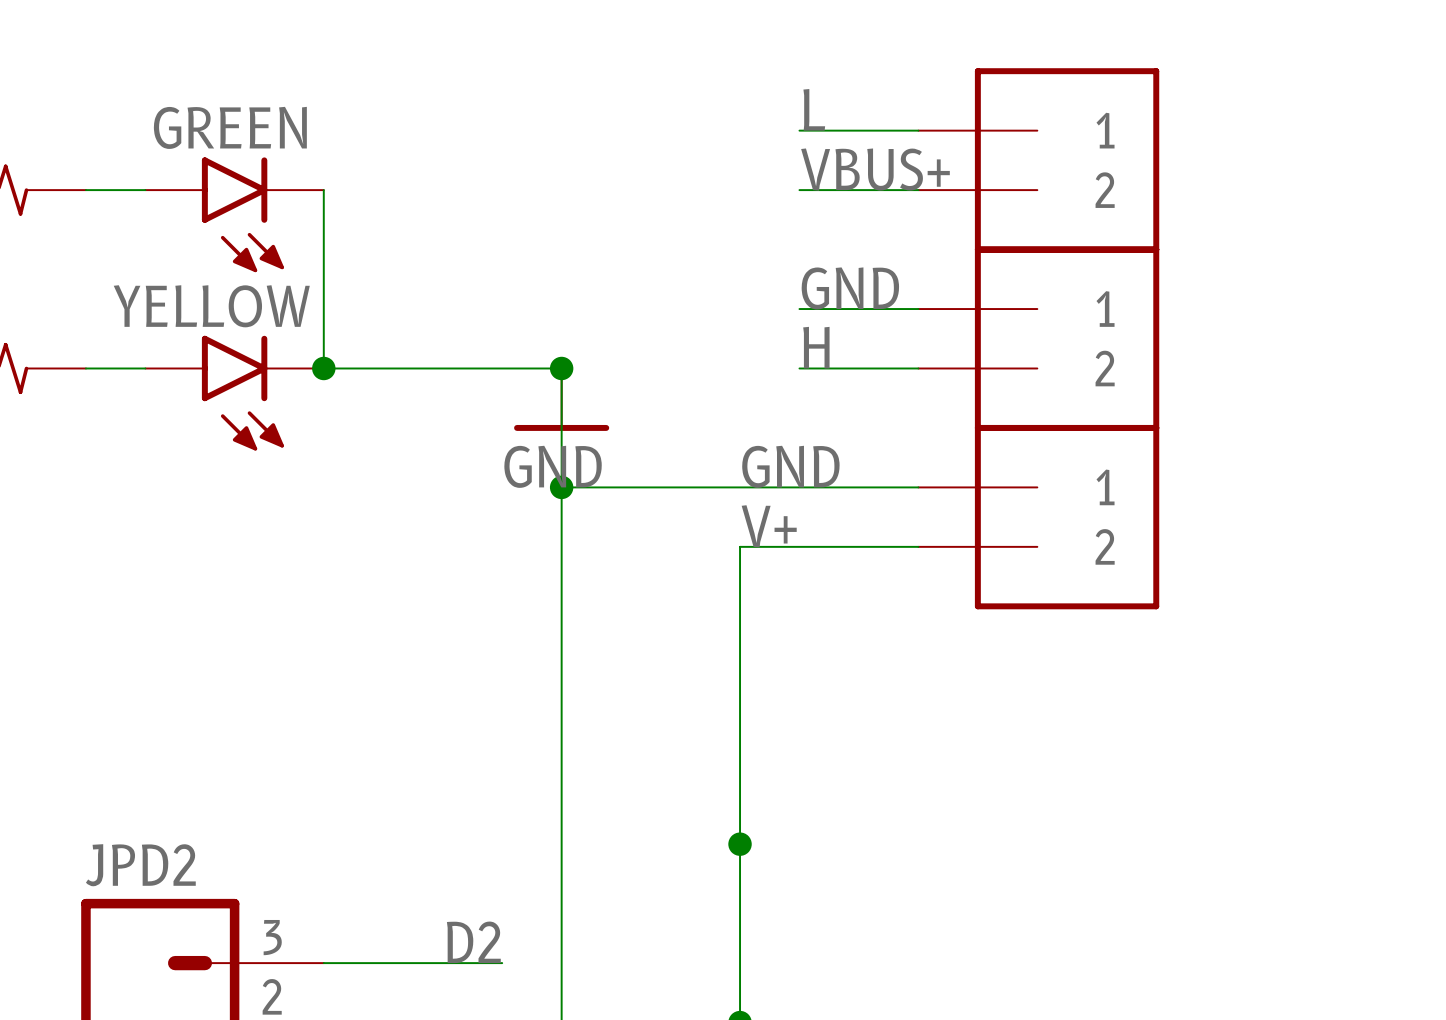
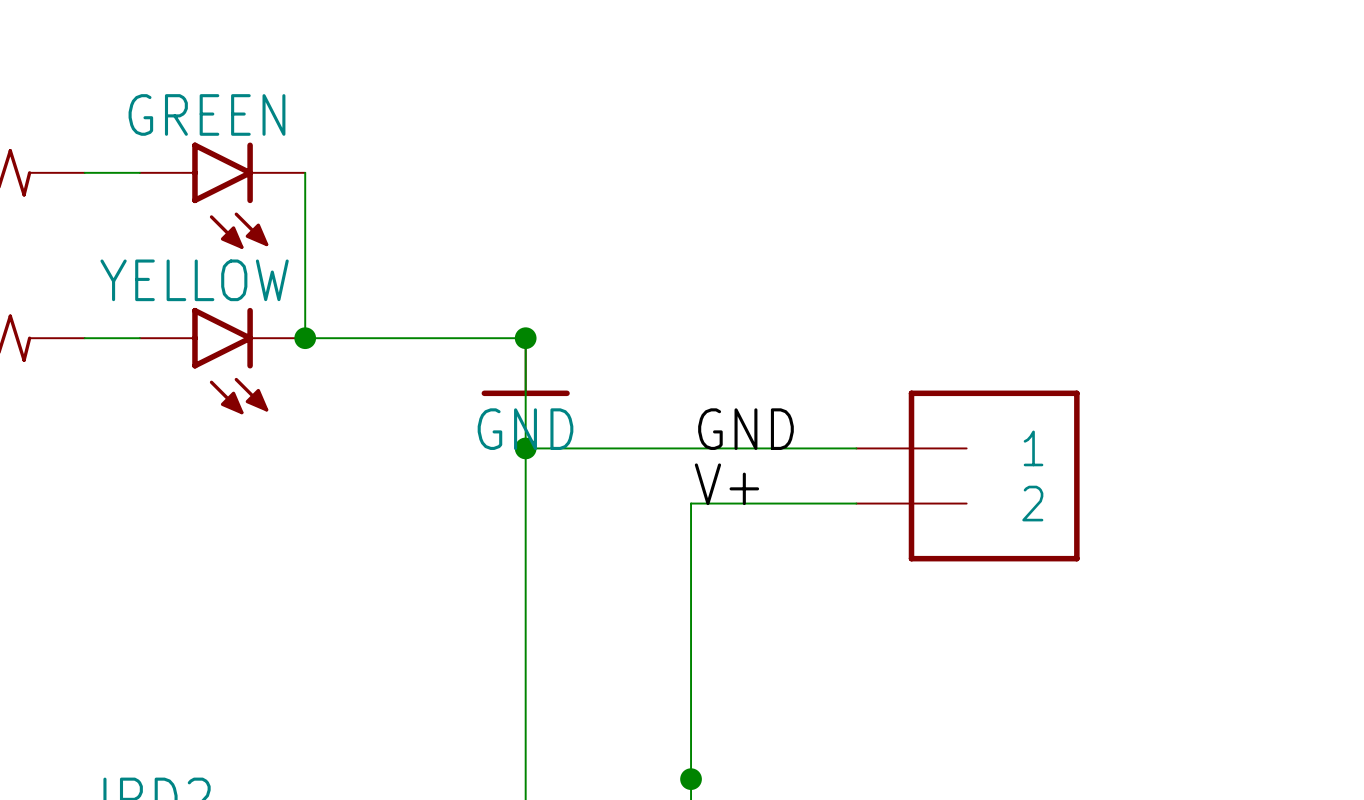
label: L (814, 109) -> none
wire: (799, 130) (918, 130) -> none
part: (1038, 160) -> none
label: VBUS+ (875, 169) -> none
wire: (799, 190) (918, 190) -> none
label: GND (850, 288) -> none
wire: (799, 309) (918, 309) -> none
part: (1038, 338) -> none
label: H (816, 347) -> none
wire: (799, 368) (918, 368) -> none

